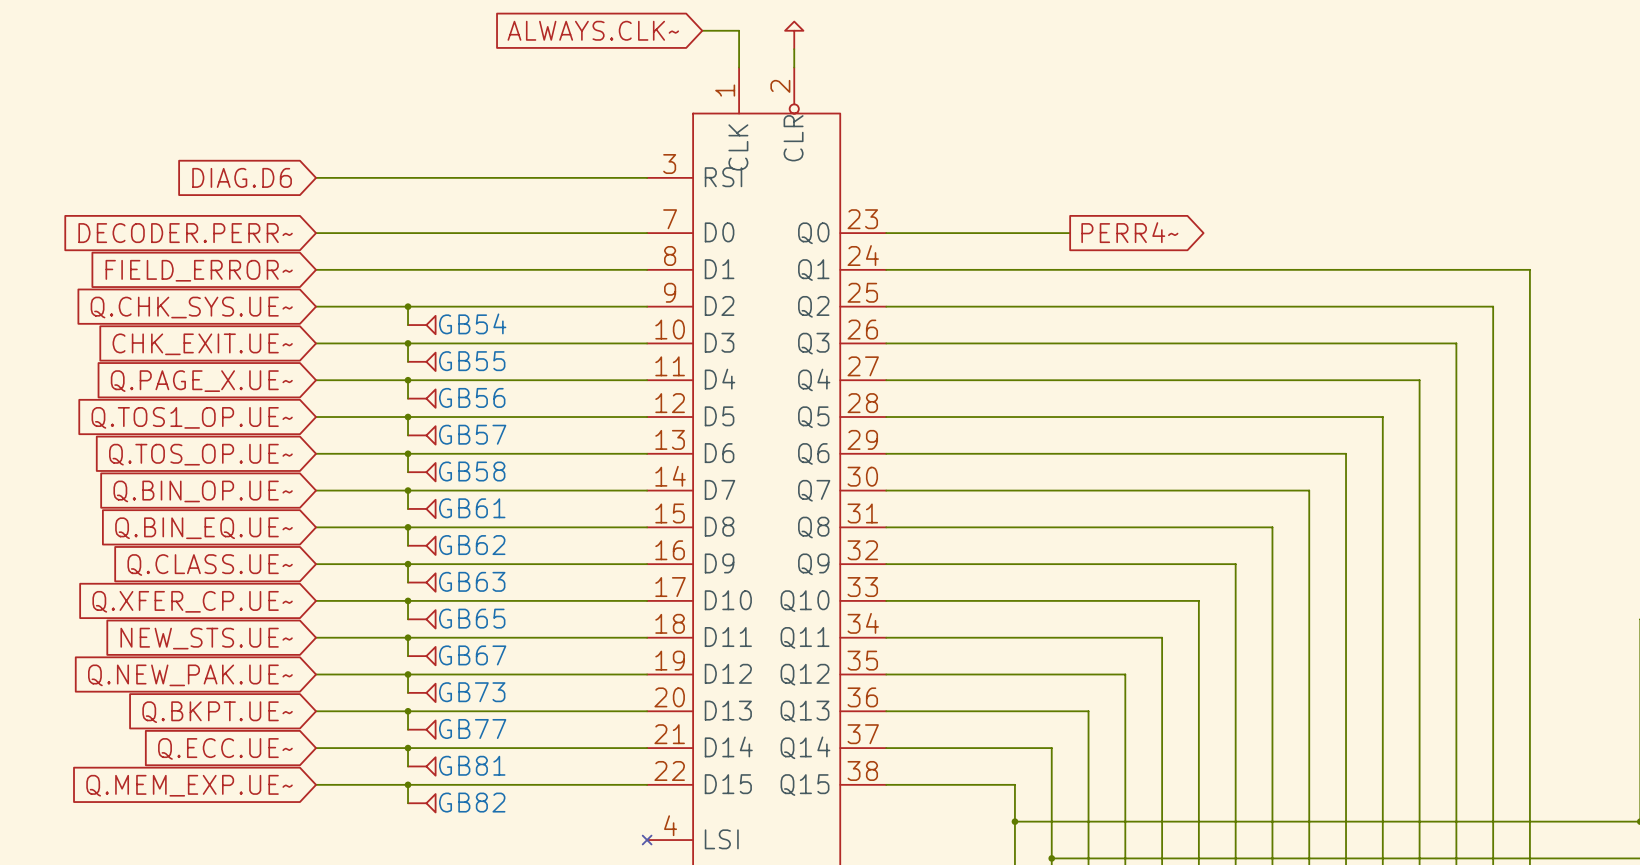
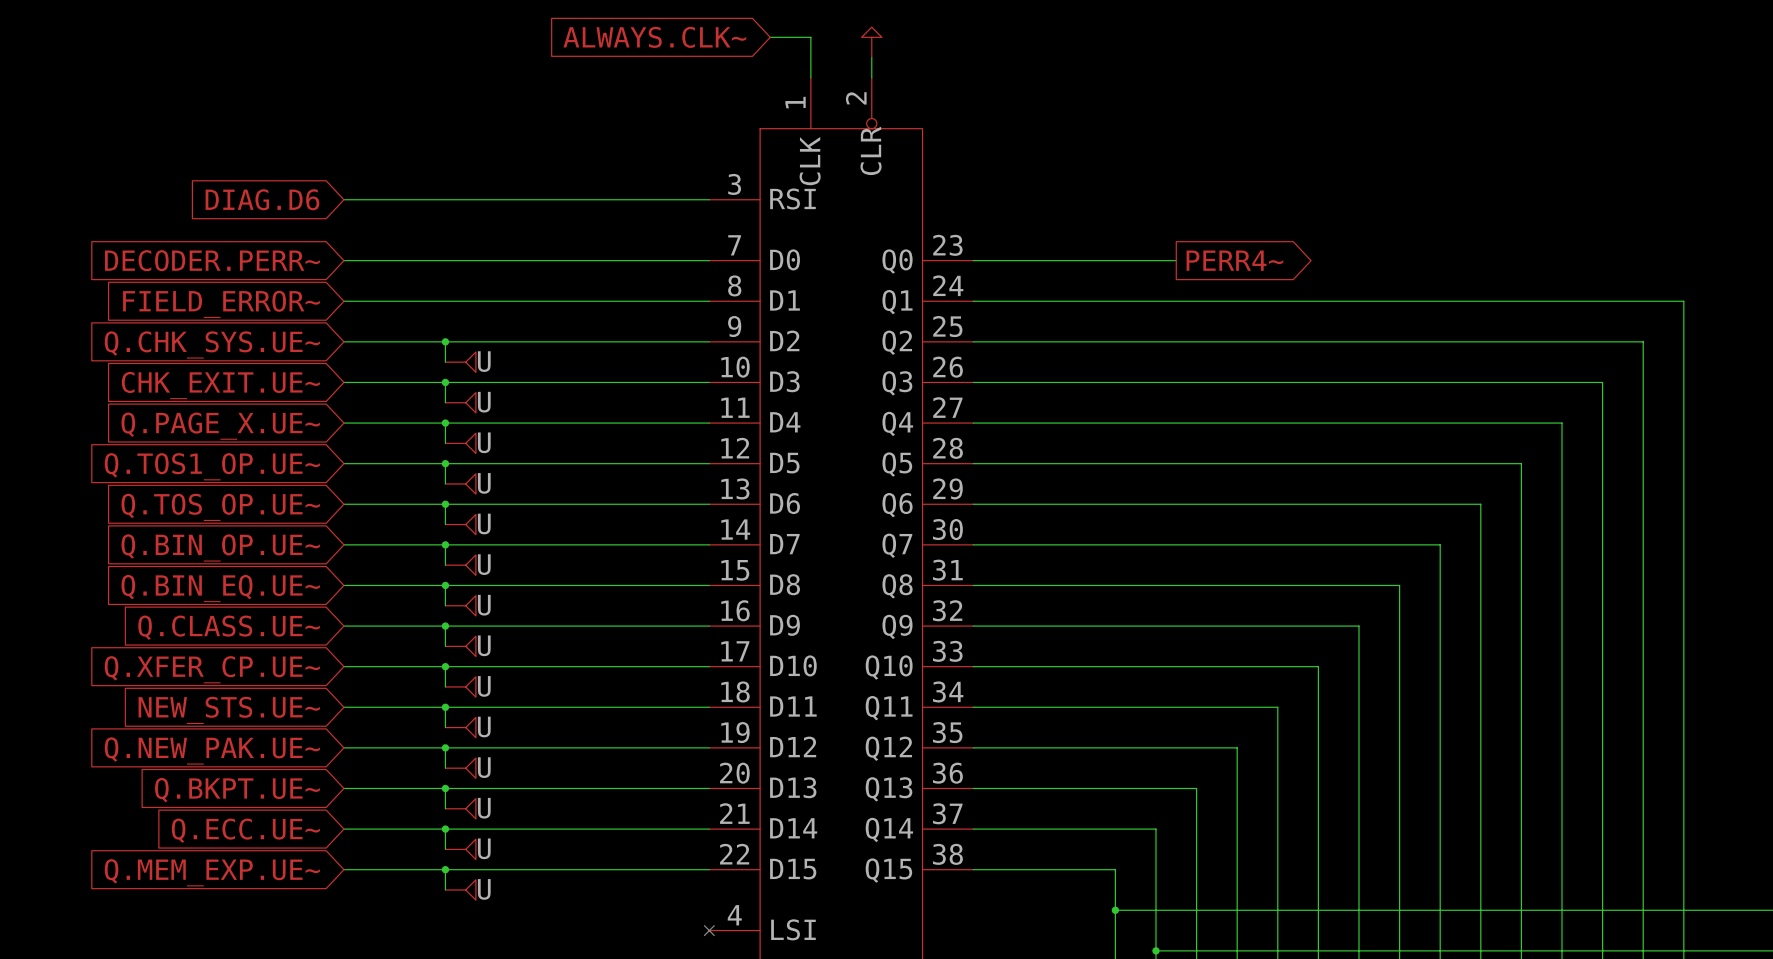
GB54 name: GB54 (472, 323) -> U (484, 361)
GB55 name: GB55 (472, 361) -> U (484, 402)
GB56 name: GB56 (472, 397) -> U (484, 442)
GB57 name: GB57 (472, 434) -> U (484, 483)
GB58 name: GB58 (472, 471) -> U (484, 524)
GB61 name: GB61 (472, 508) -> U (484, 564)
GB62 name: GB62 (472, 545) -> U (484, 605)
GB63 name: GB63 (472, 581) -> U (484, 645)
GB65 name: GB65 (472, 618) -> U (484, 686)
GB67 name: GB67 (472, 655) -> U (484, 727)
GB73 name: GB73 (472, 692) -> U (484, 767)
GB77 name: GB77 (472, 728) -> U (484, 808)
GB81 name: GB81 (472, 765) -> U (484, 848)
GB82 name: GB82 (472, 802) -> U (484, 889)

